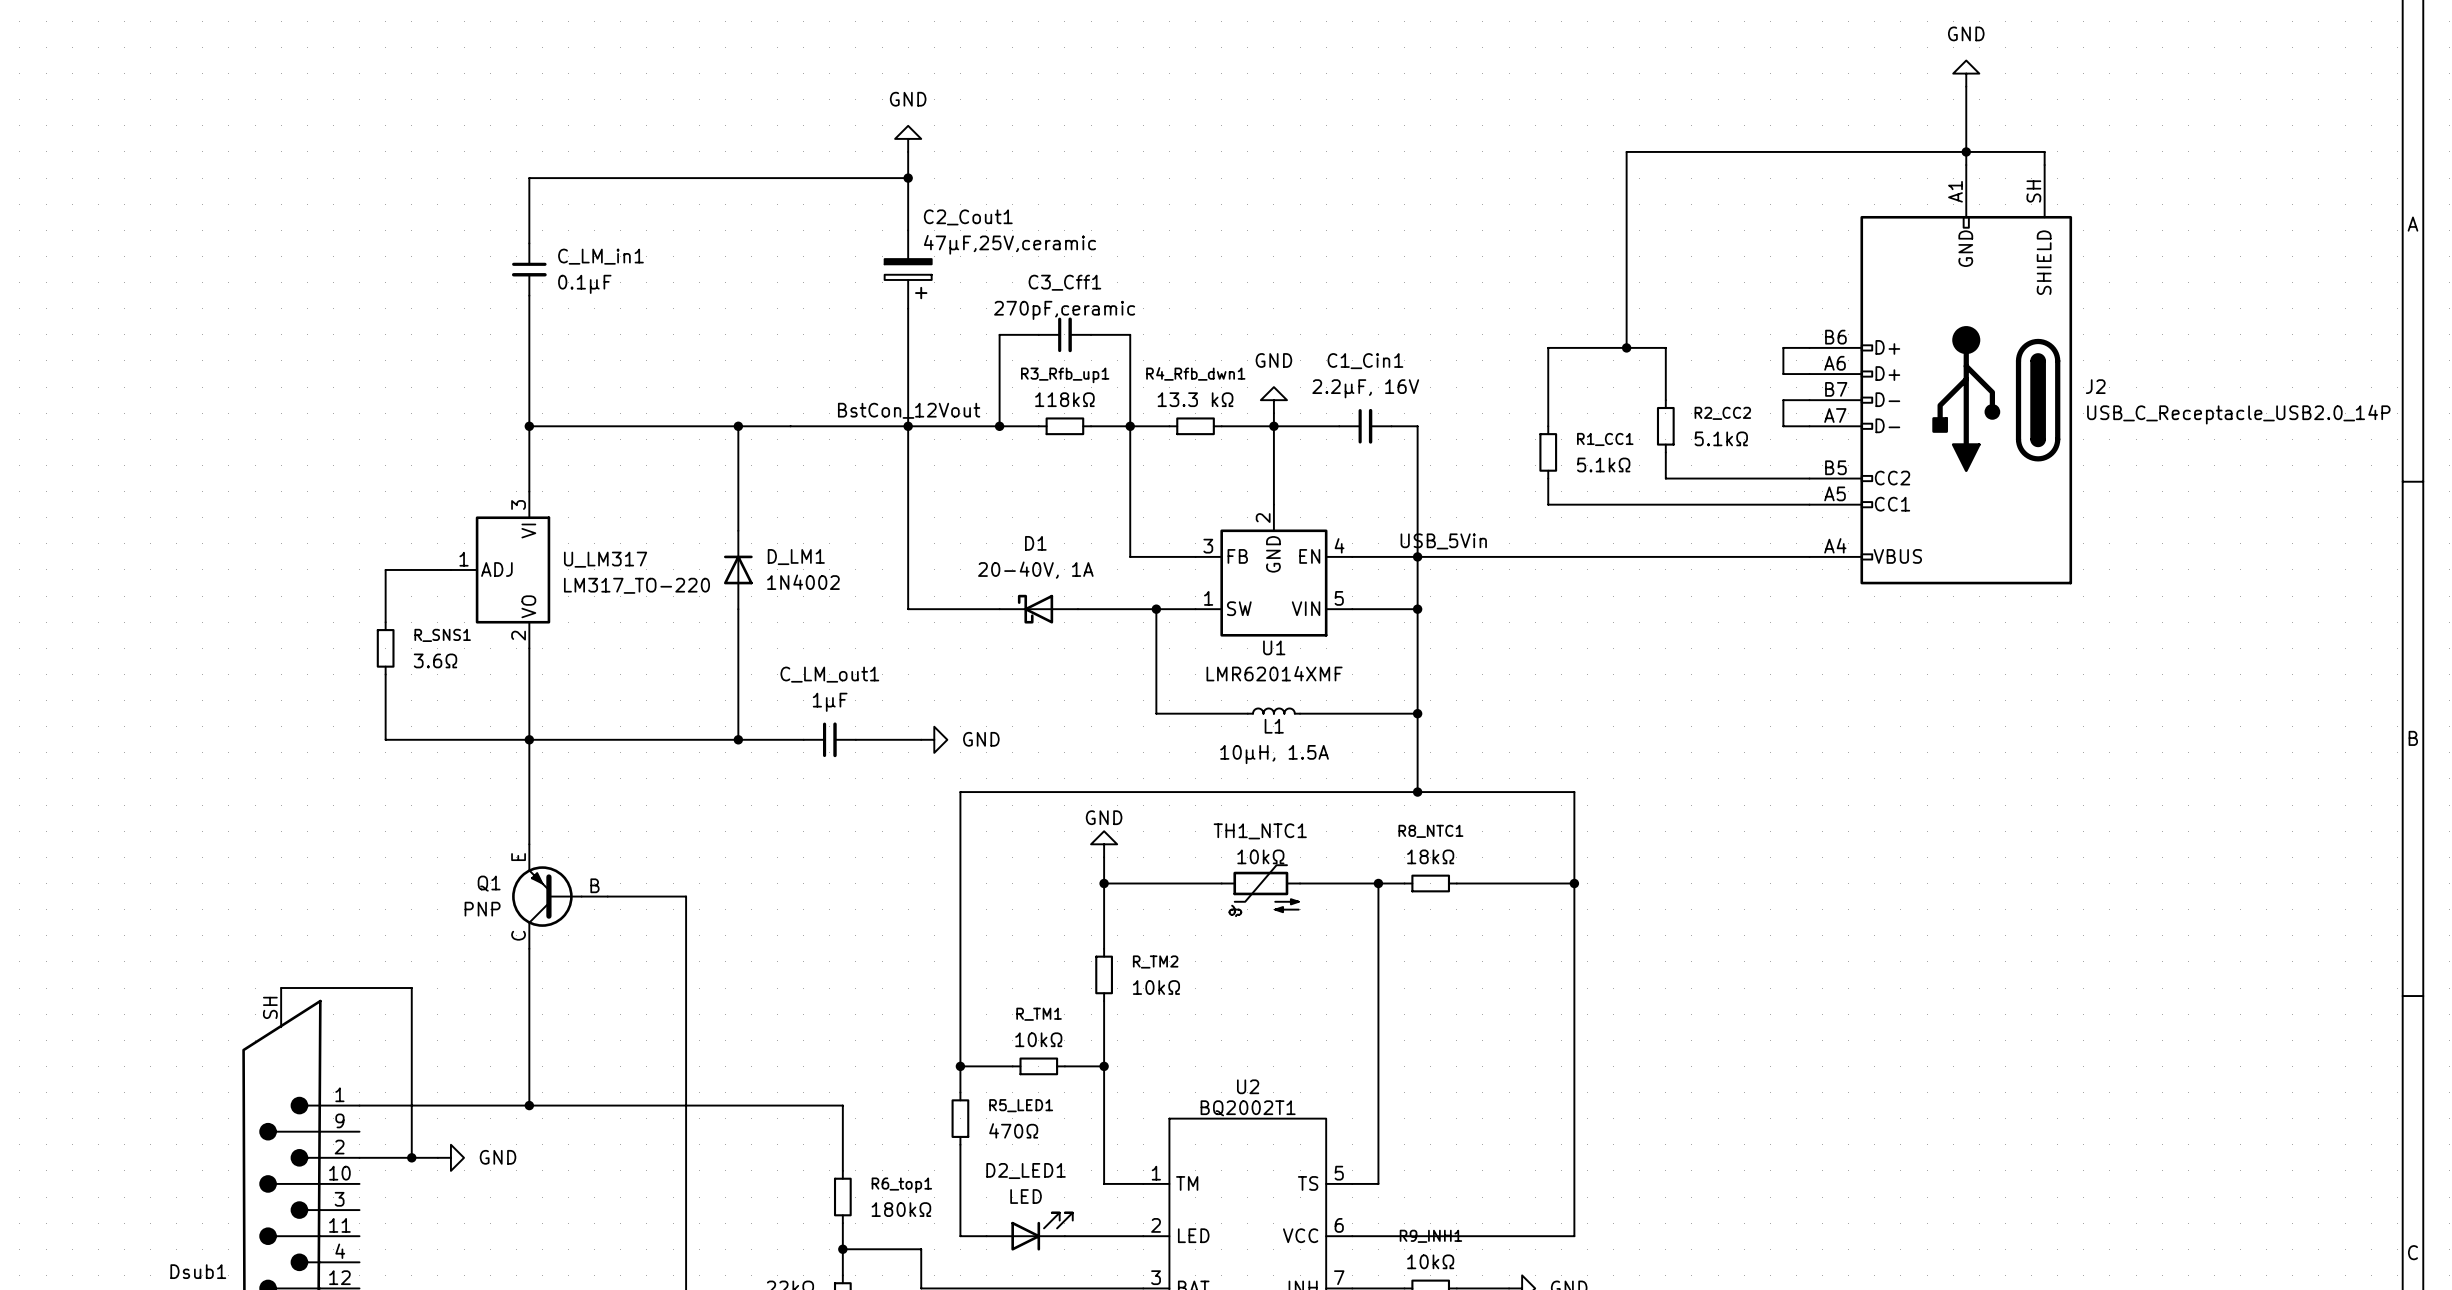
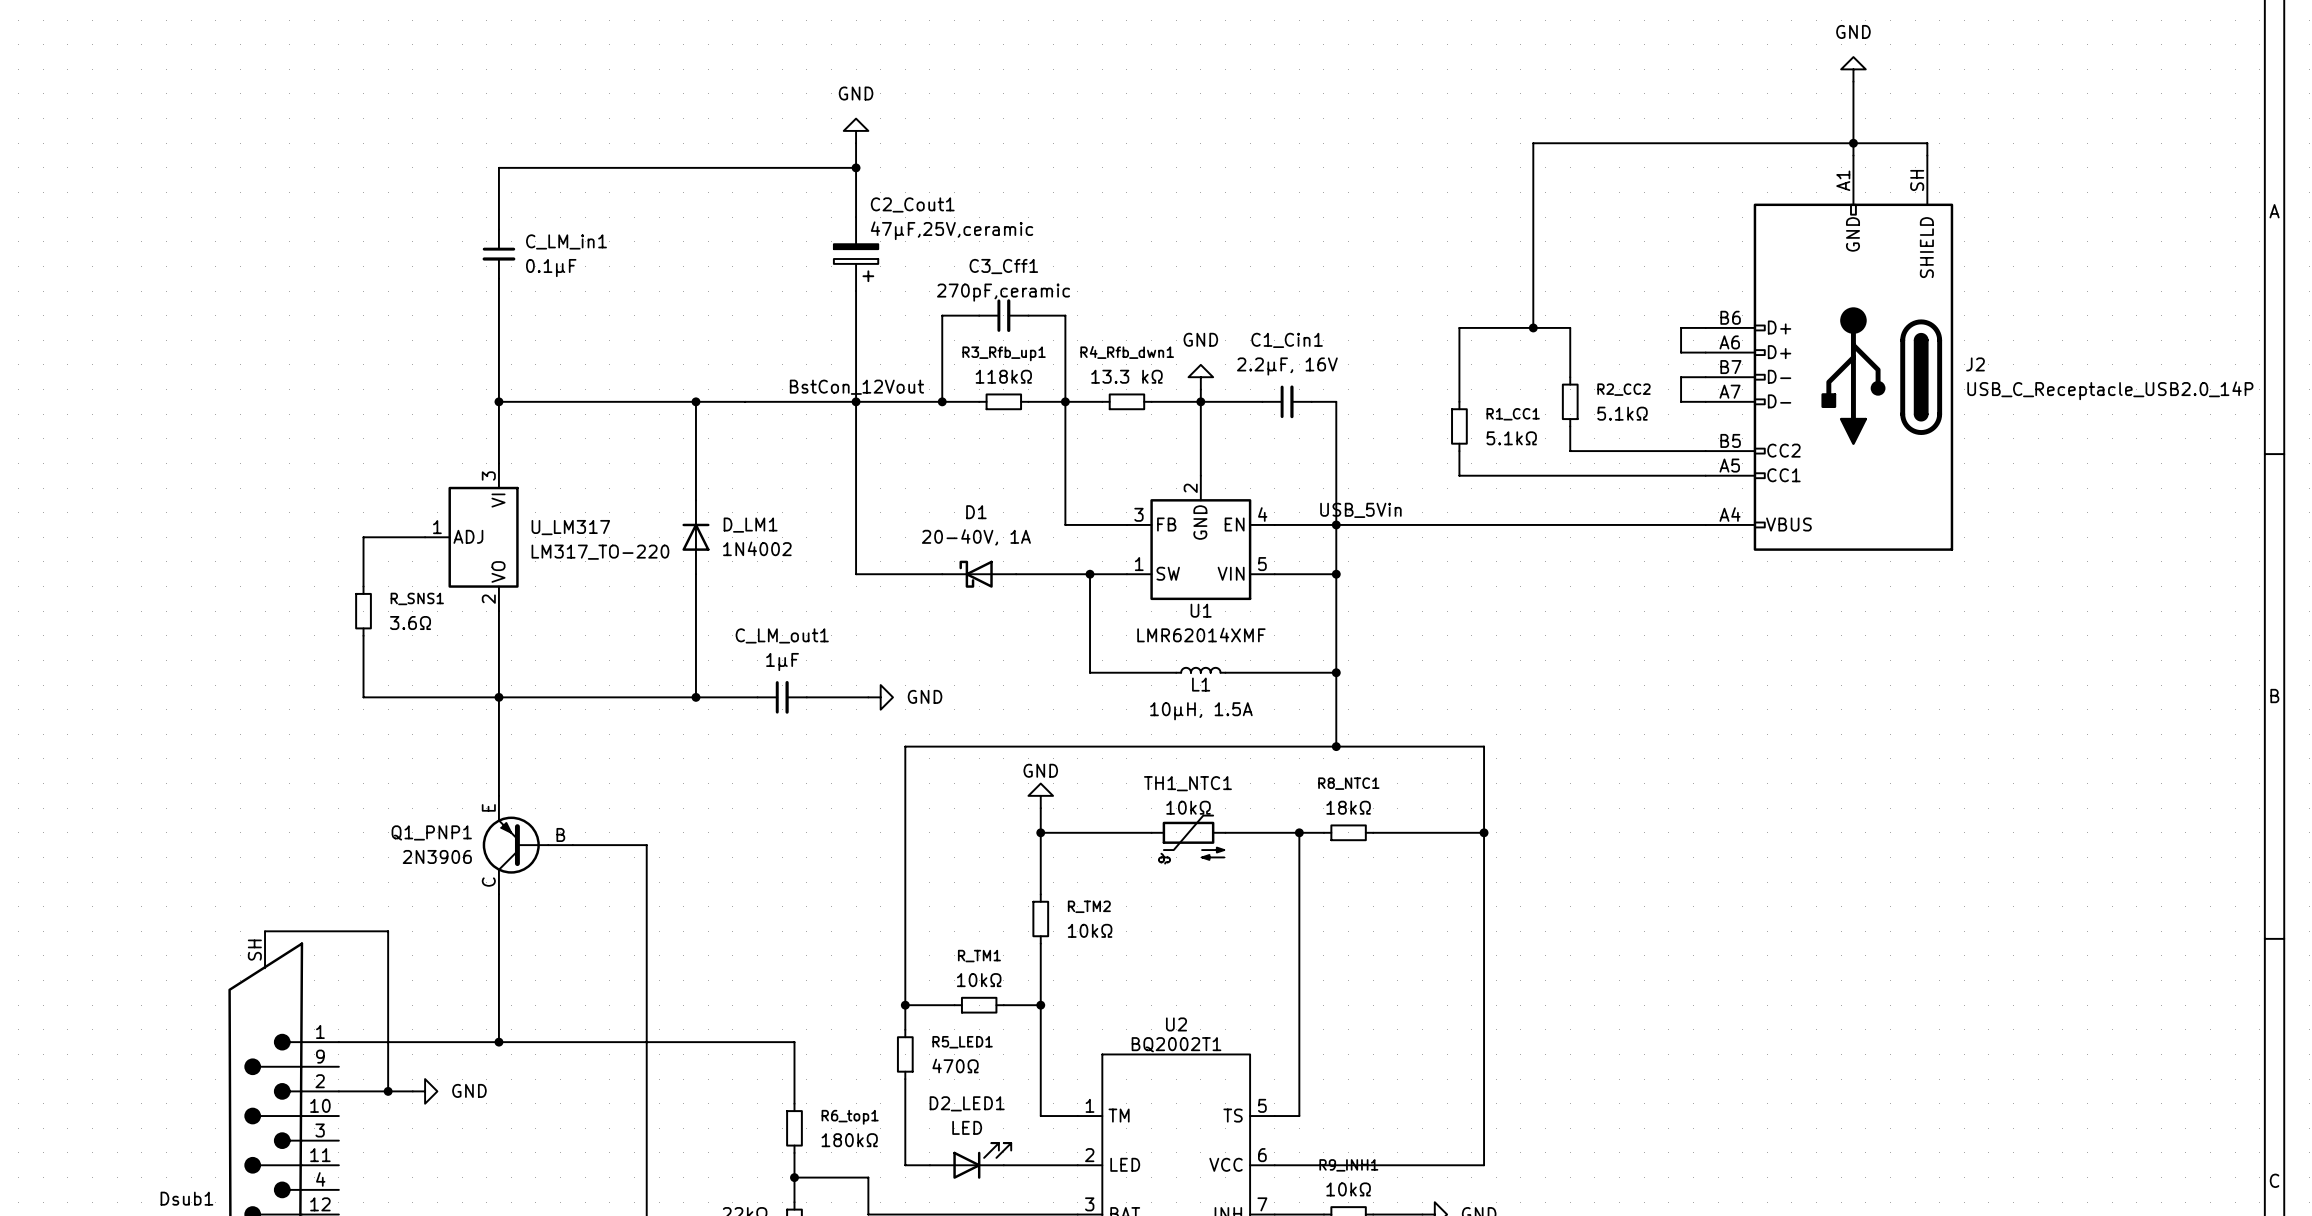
Q1 name: Q1 (489, 883) -> Q1_PNP1 (431, 832)
Q1 value: PNP (482, 909) -> 2N3906 (437, 856)

